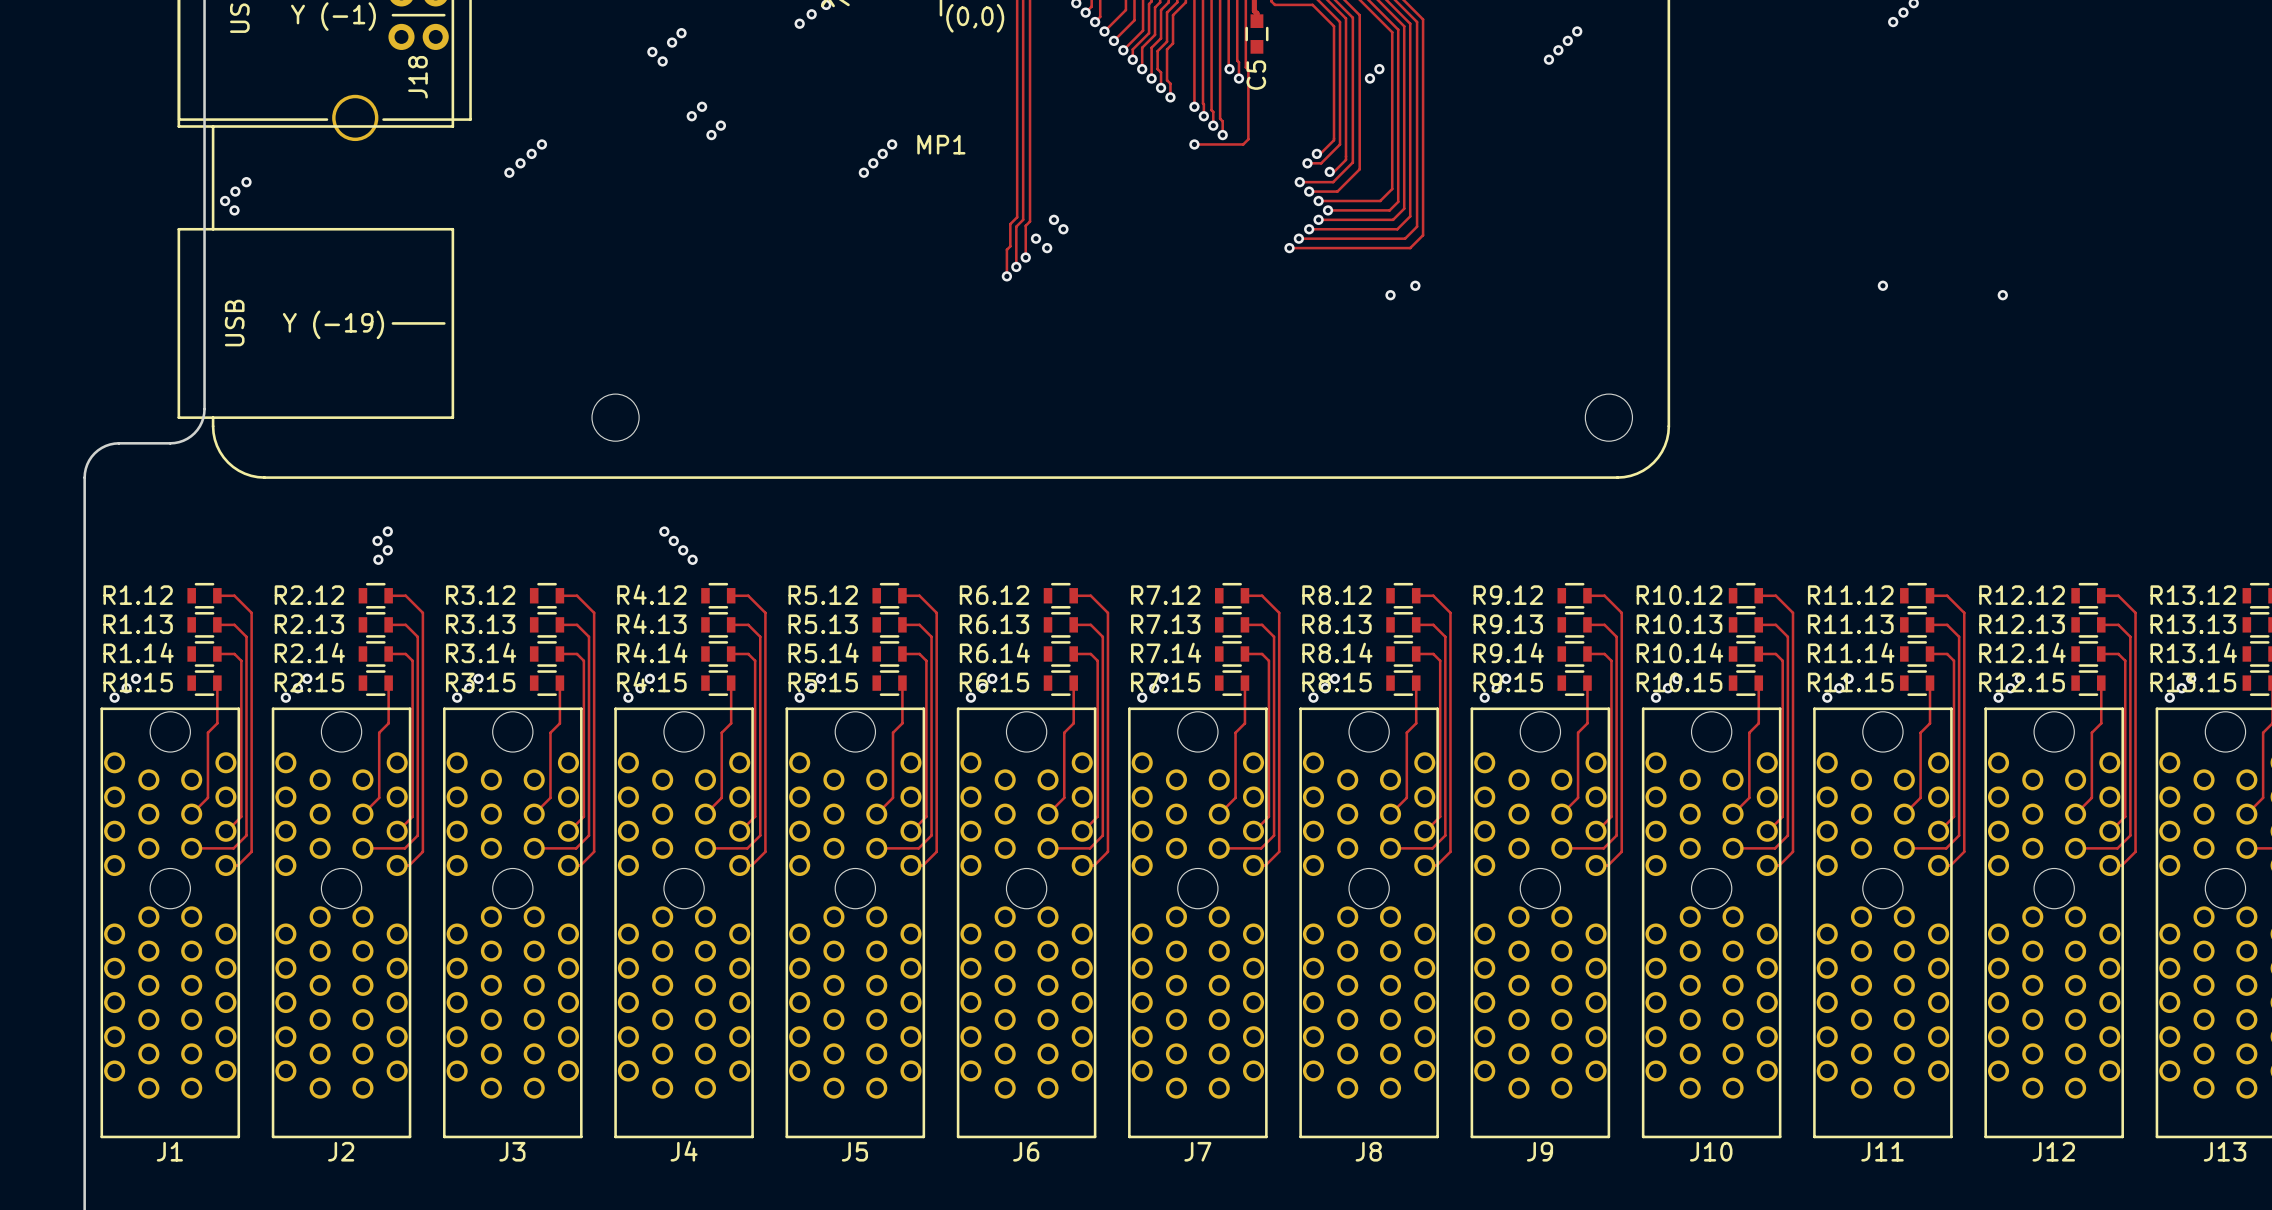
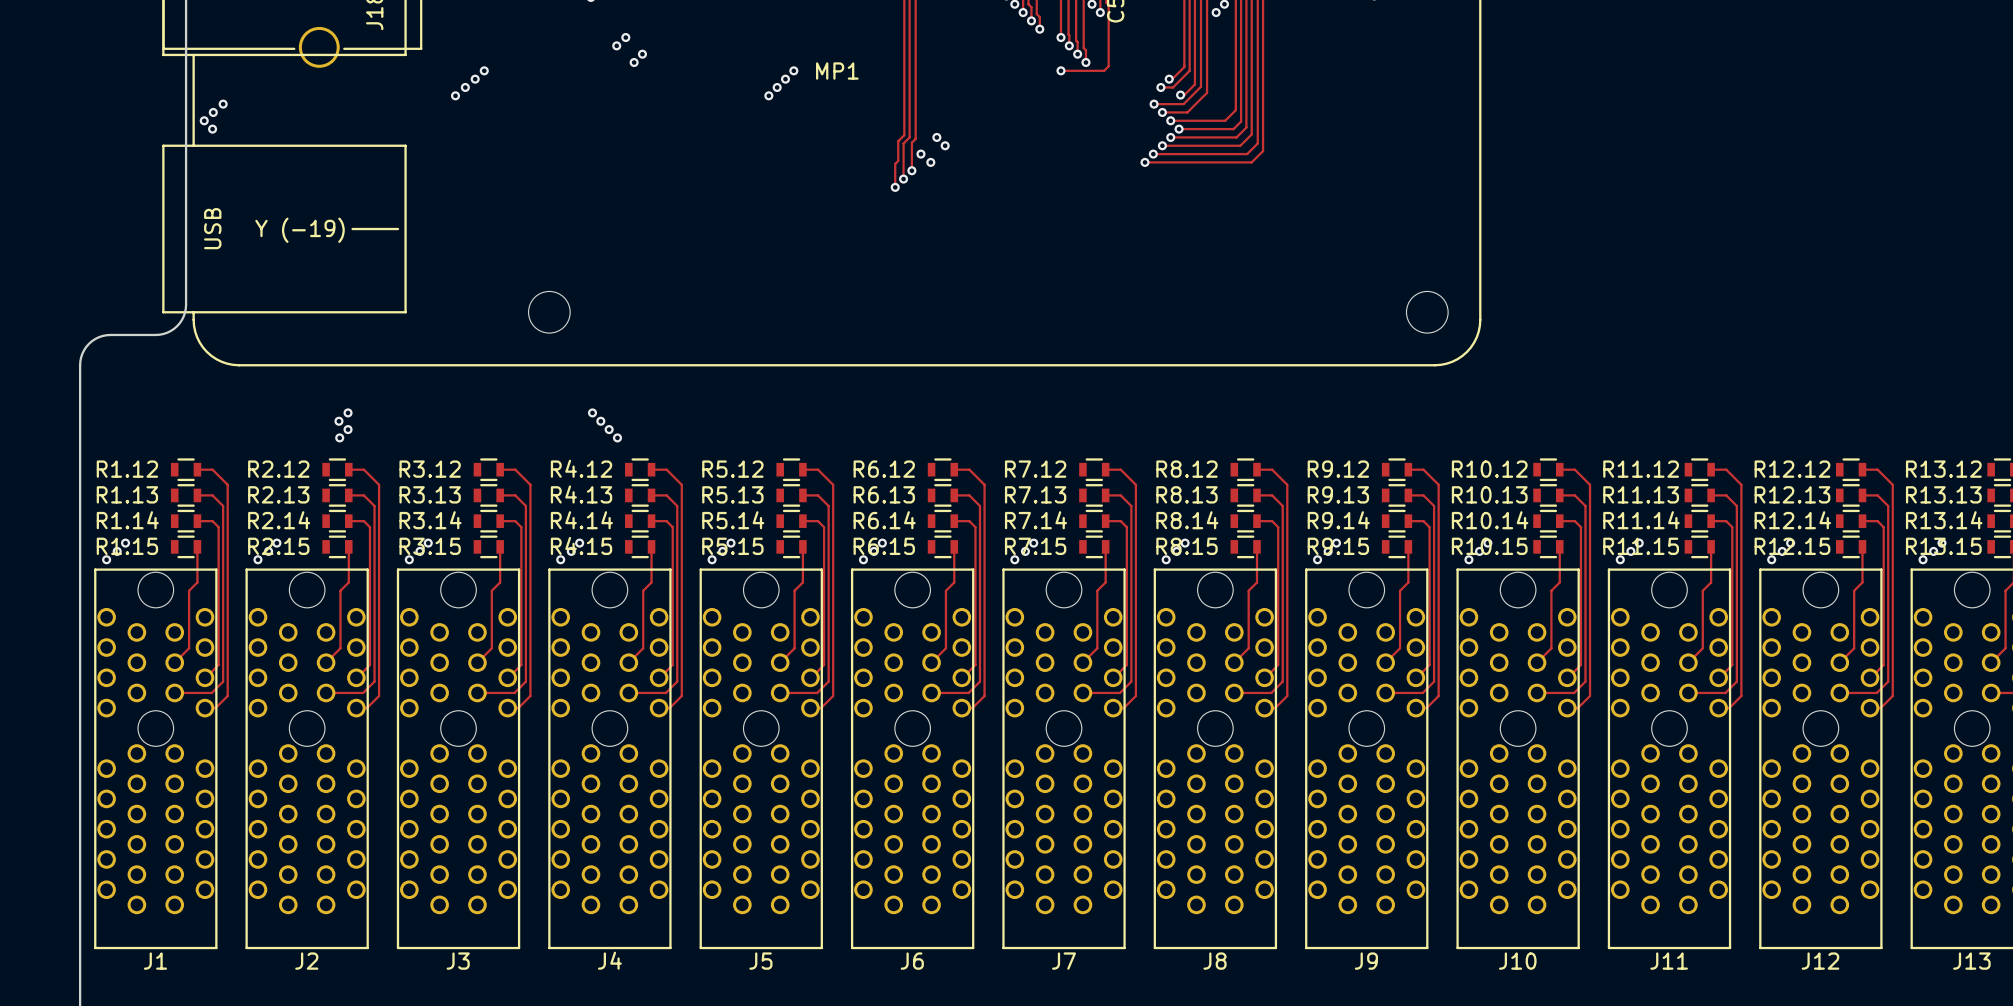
via: (1415, 285) -> none
via: (1882, 285) -> none
via: (1390, 295) -> none
via: (2002, 295) -> none

